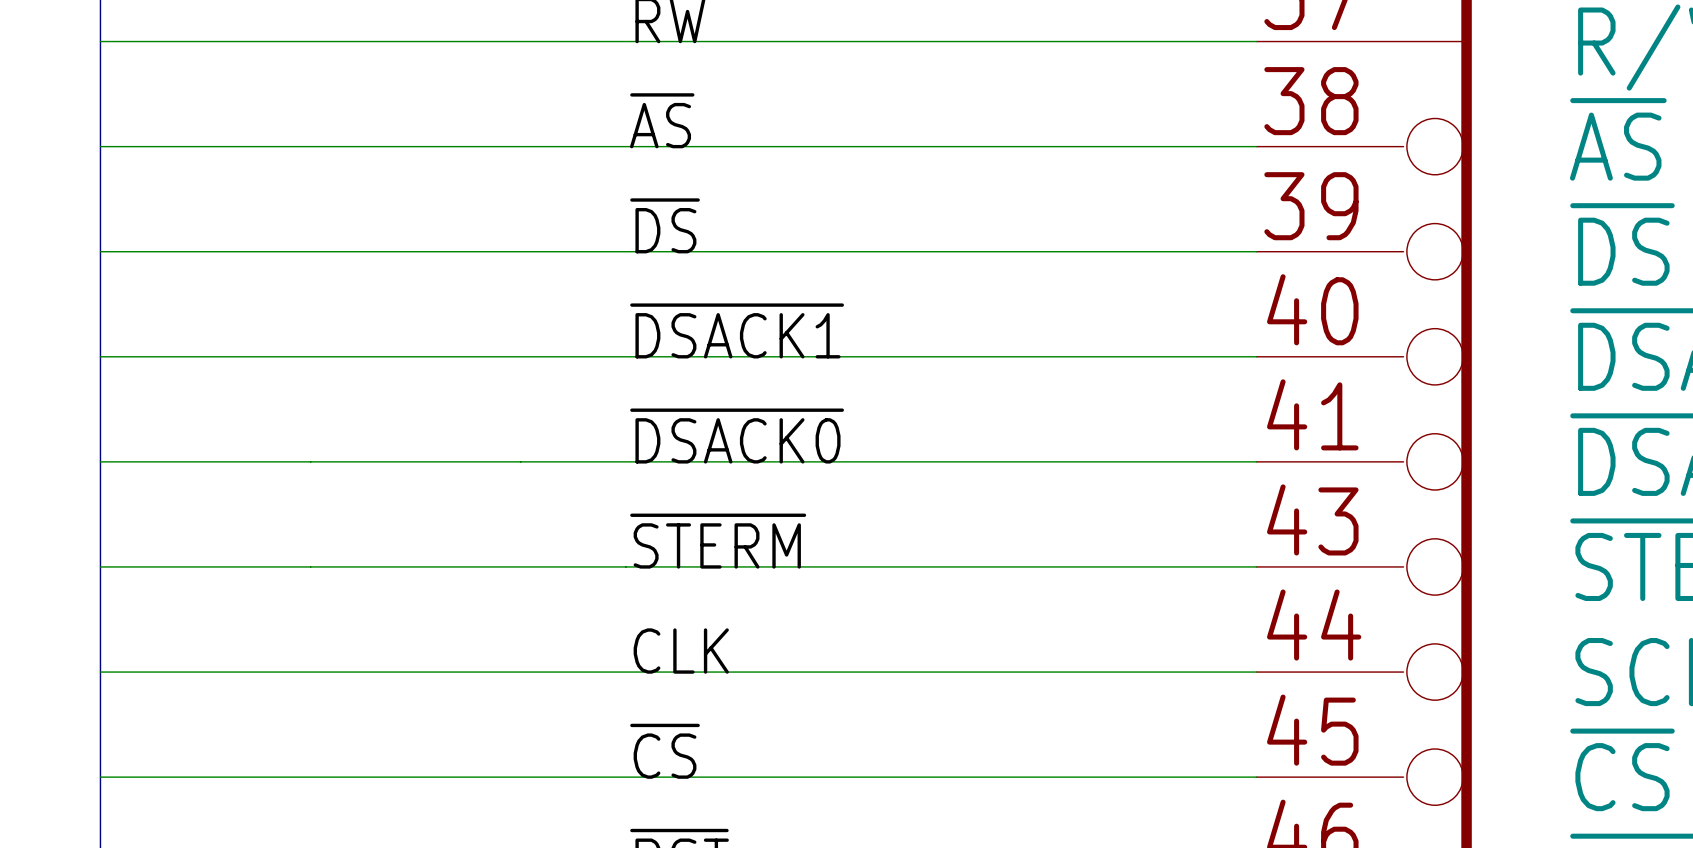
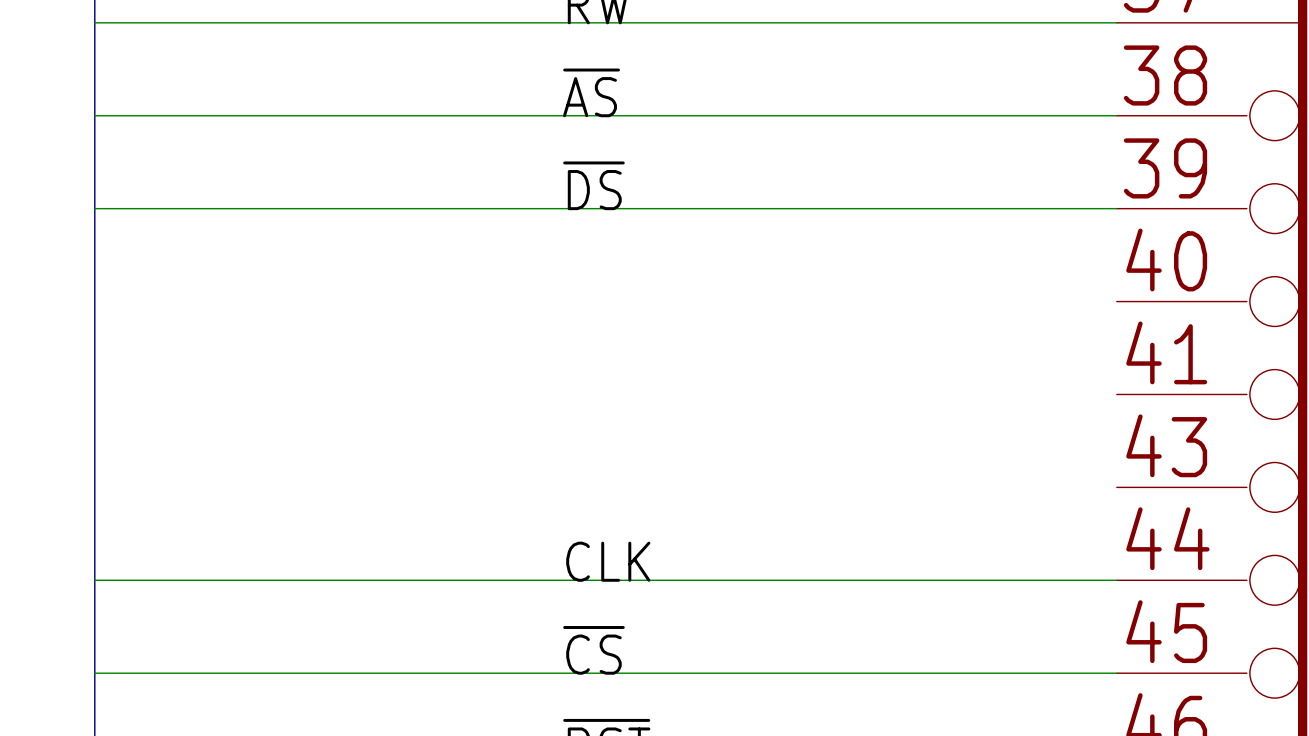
label: ~{DSACK1} (737, 330) -> none
wire: (100, 356) (1256, 356) -> none
label: ~{DSACK0} (737, 436) -> none
wire: (100, 461) (1256, 461) -> none
label: ~{STERM} (718, 541) -> none
wire: (100, 566) (1256, 566) -> none

